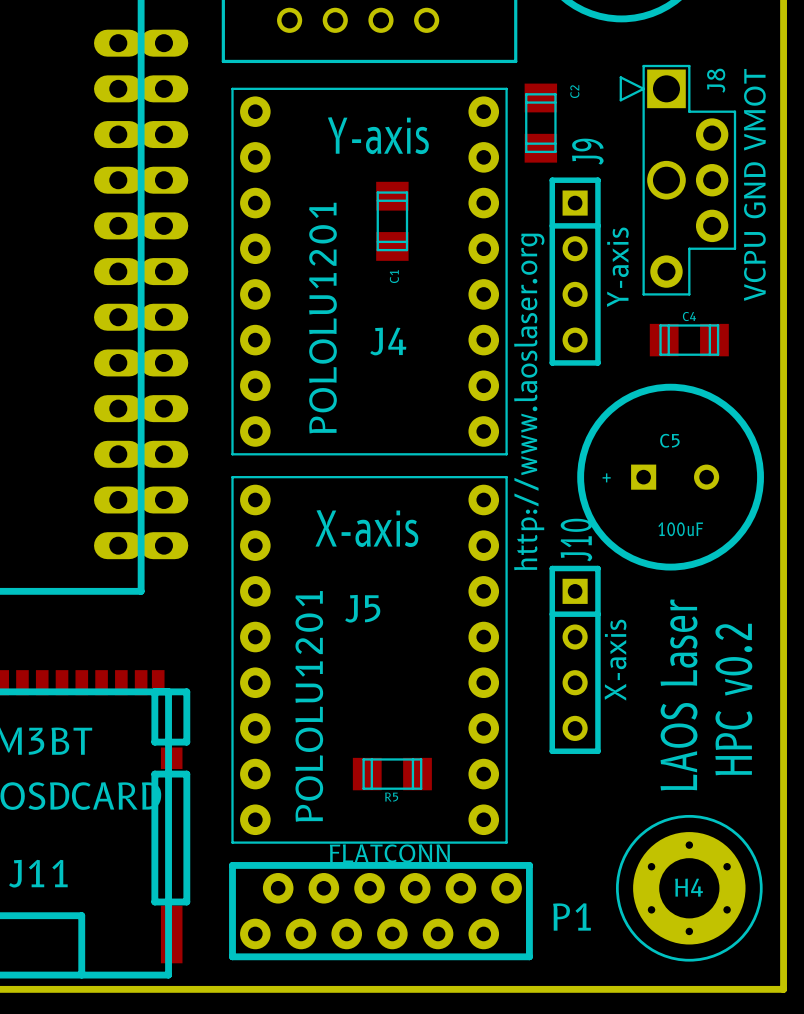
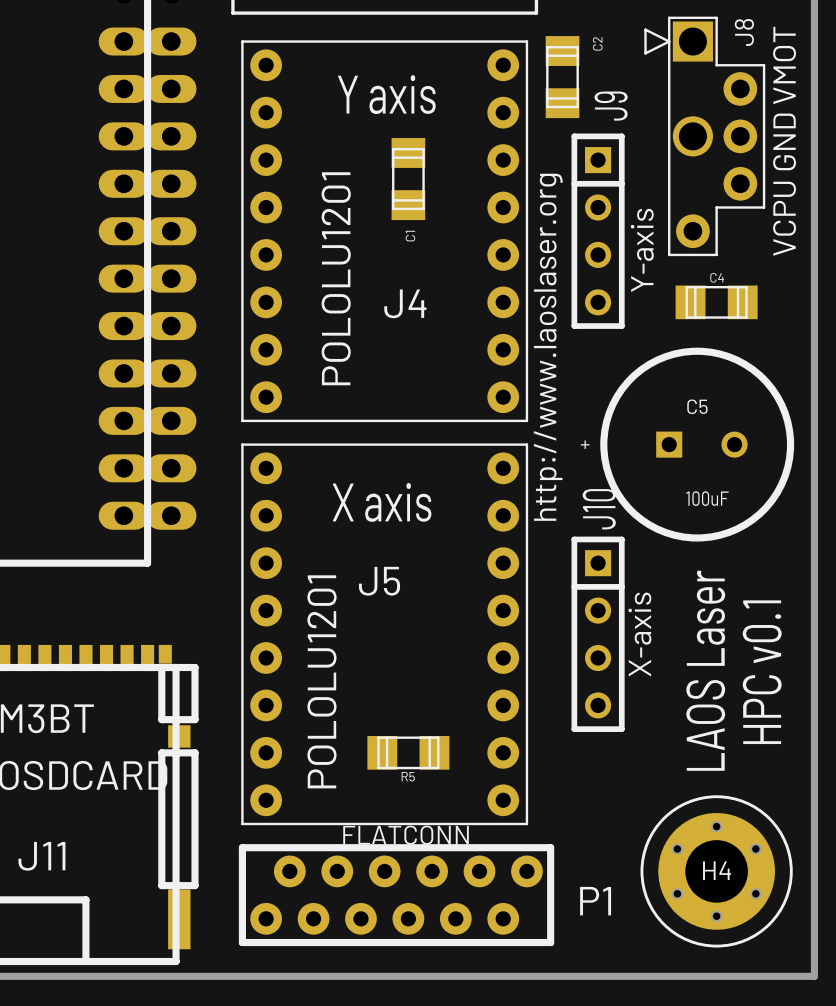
text: Y-axis (378, 135) -> Y axis (386, 94)
text position: Y-axis (617, 267) -> Y-axis (642, 250)
text position: http://www.laoslaser.org (529, 401) -> http://www.laoslaser.org (548, 347)
C5 text position: + (606, 477) -> + (585, 444)
text: X-axis (366, 528) -> X axis (382, 502)
text: HPC v0.2 (733, 699) -> HPC v0.1 (762, 672)

